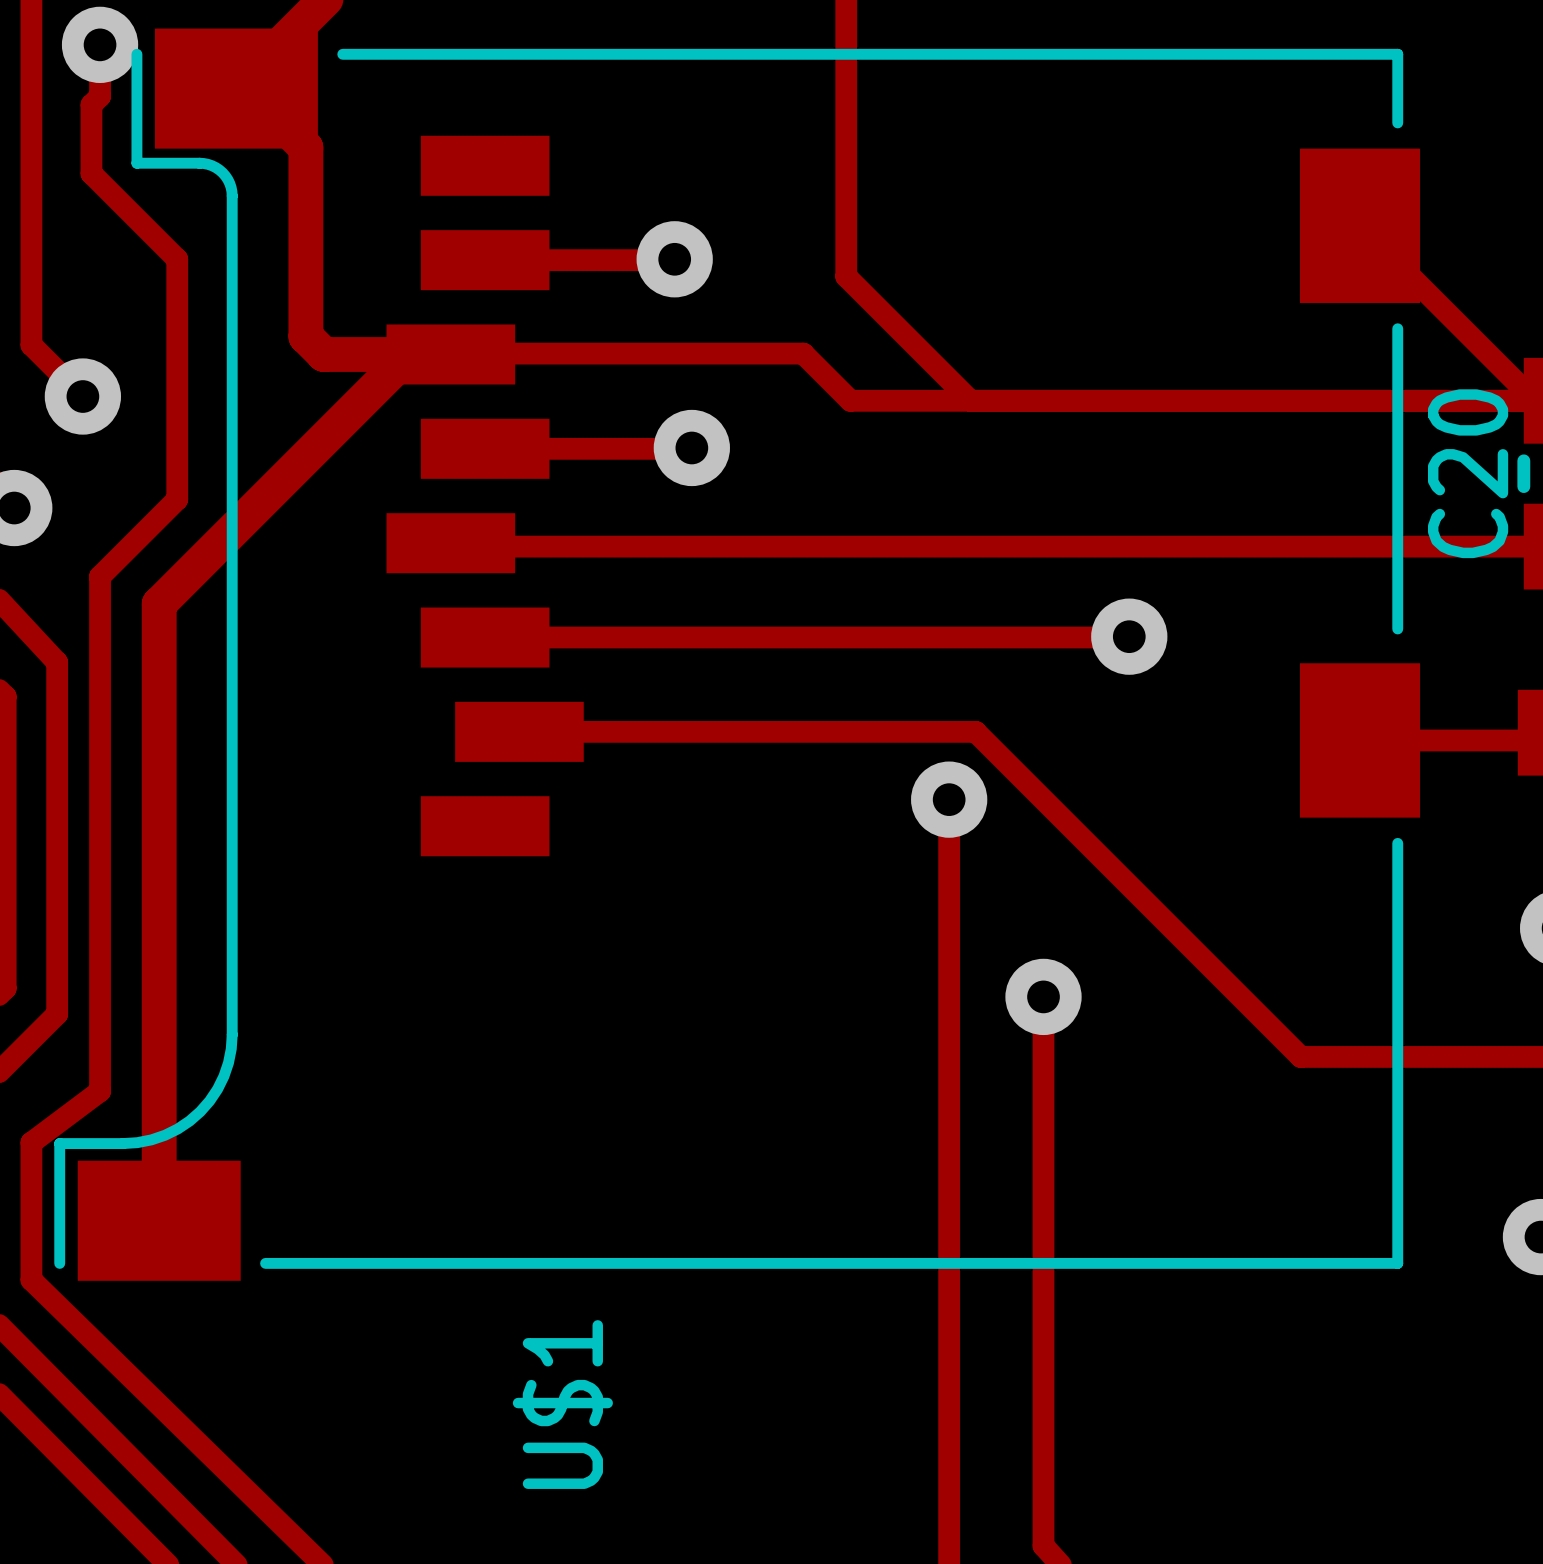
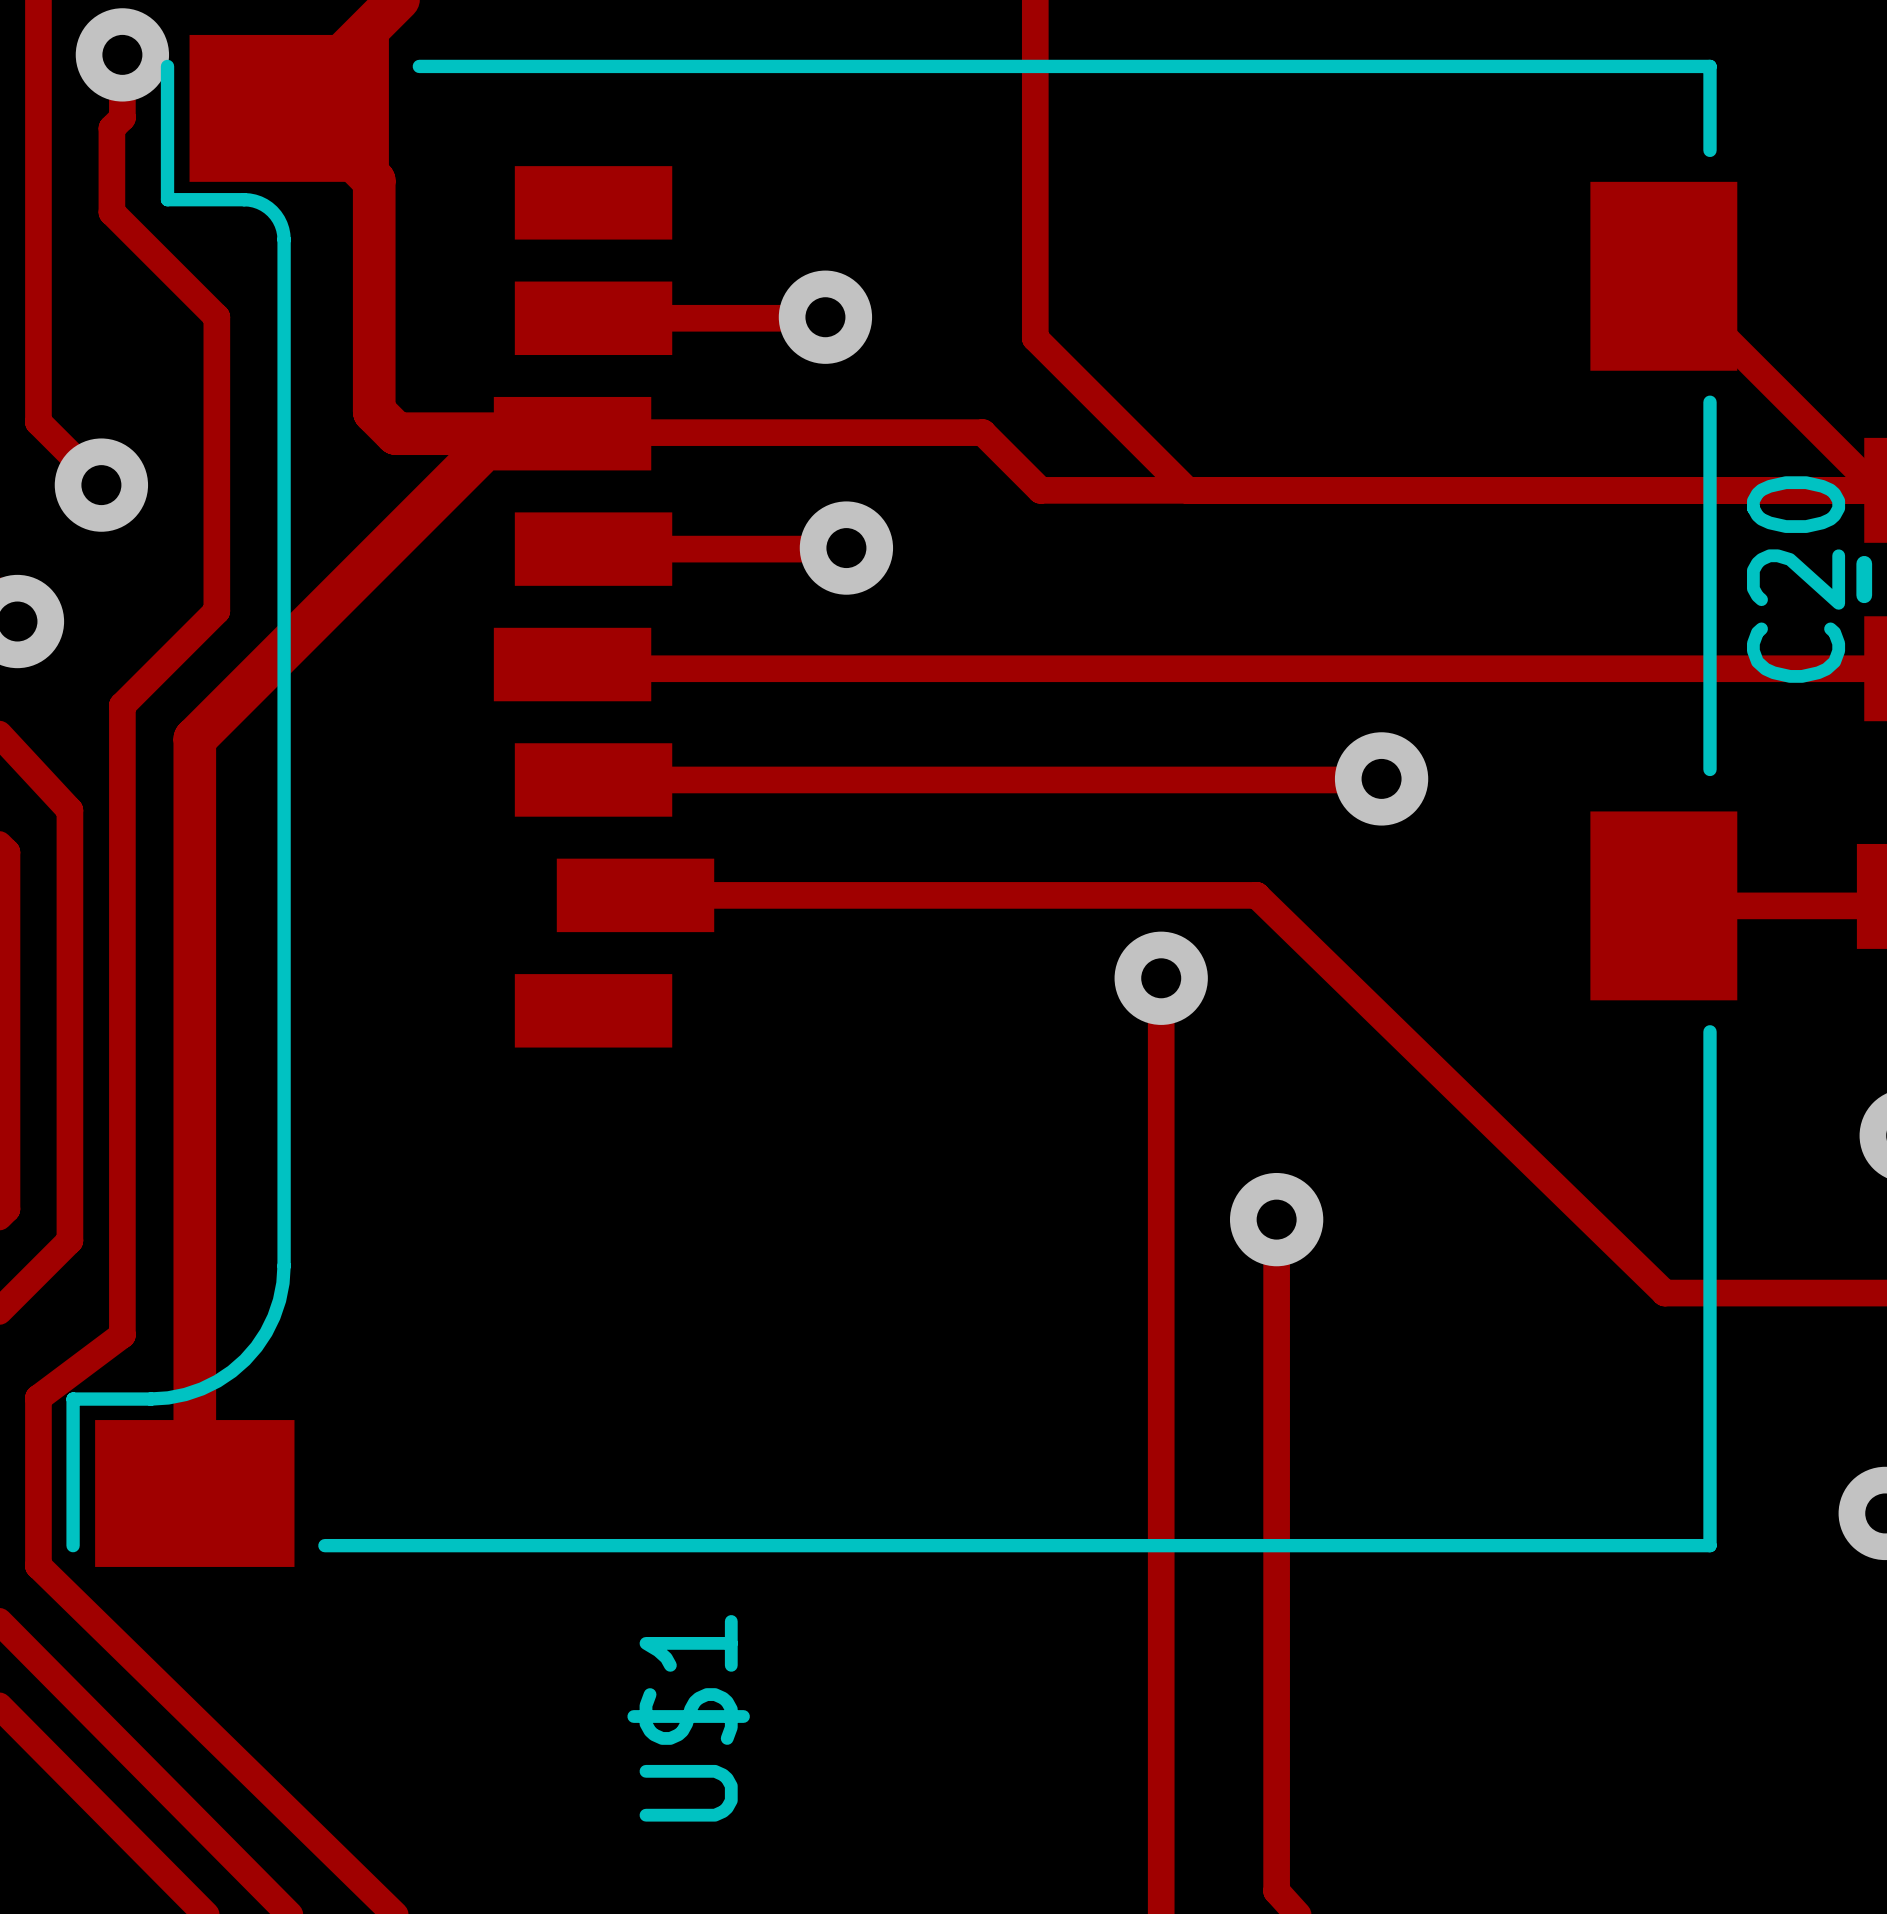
U$1 footprint: [54, 28, 1421, 1281] -> [66, 34, 1738, 1567]
track: (975, 731) (1300, 1056) (1360, 1056) -> (1193, 895) (1256, 895) (1664, 1293)

